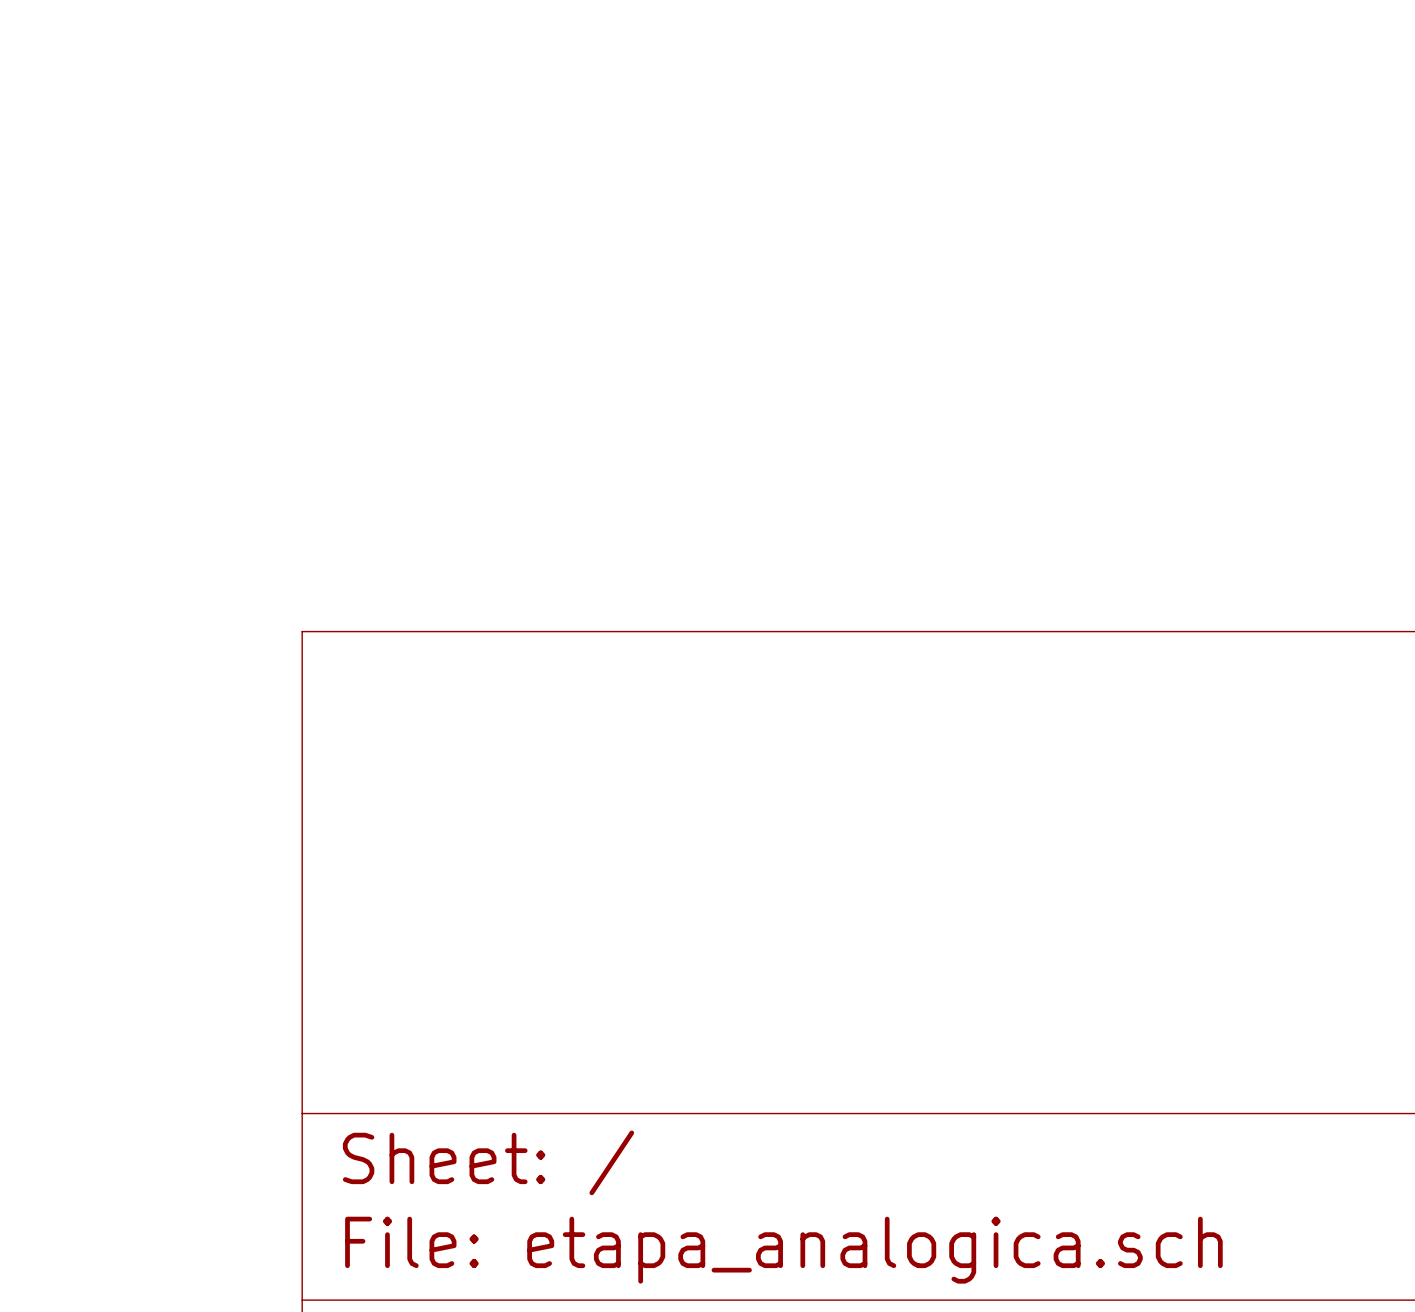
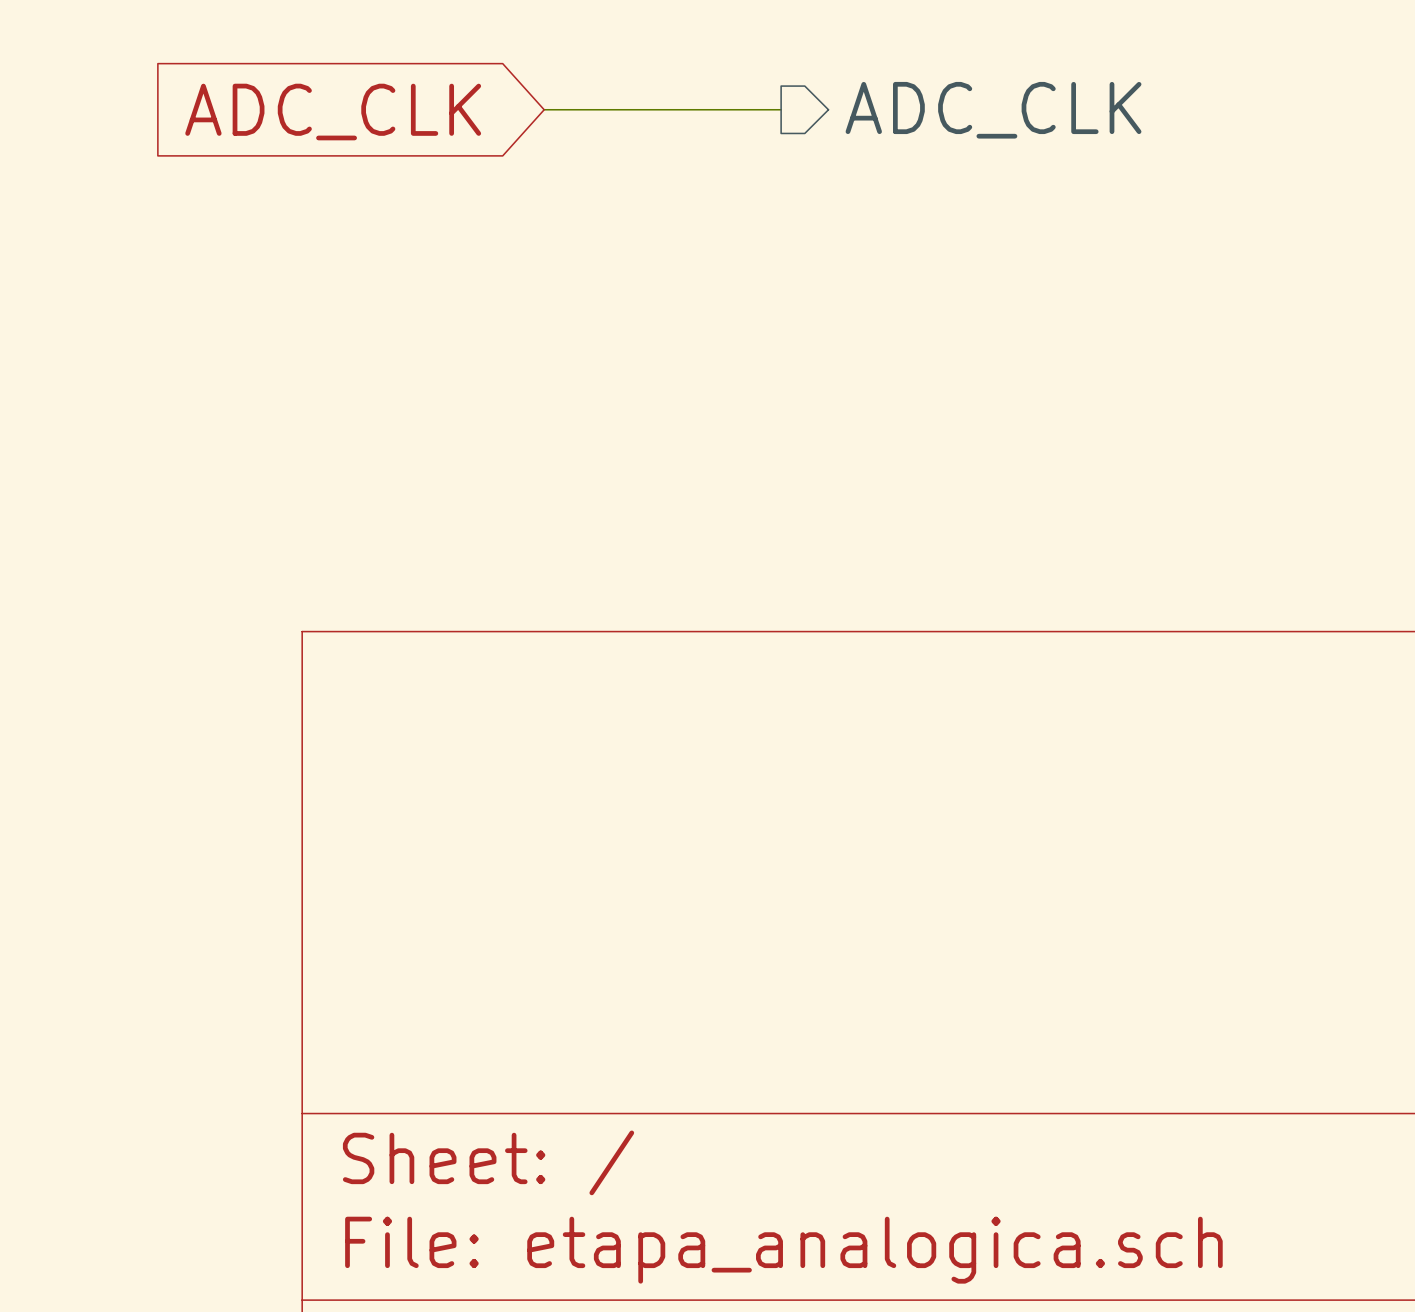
wire: none -> (544, 109) (781, 109)
sheet pin: none -> ADC_CLK (993, 110)
global label: none -> ADC_CLK (333, 112)

